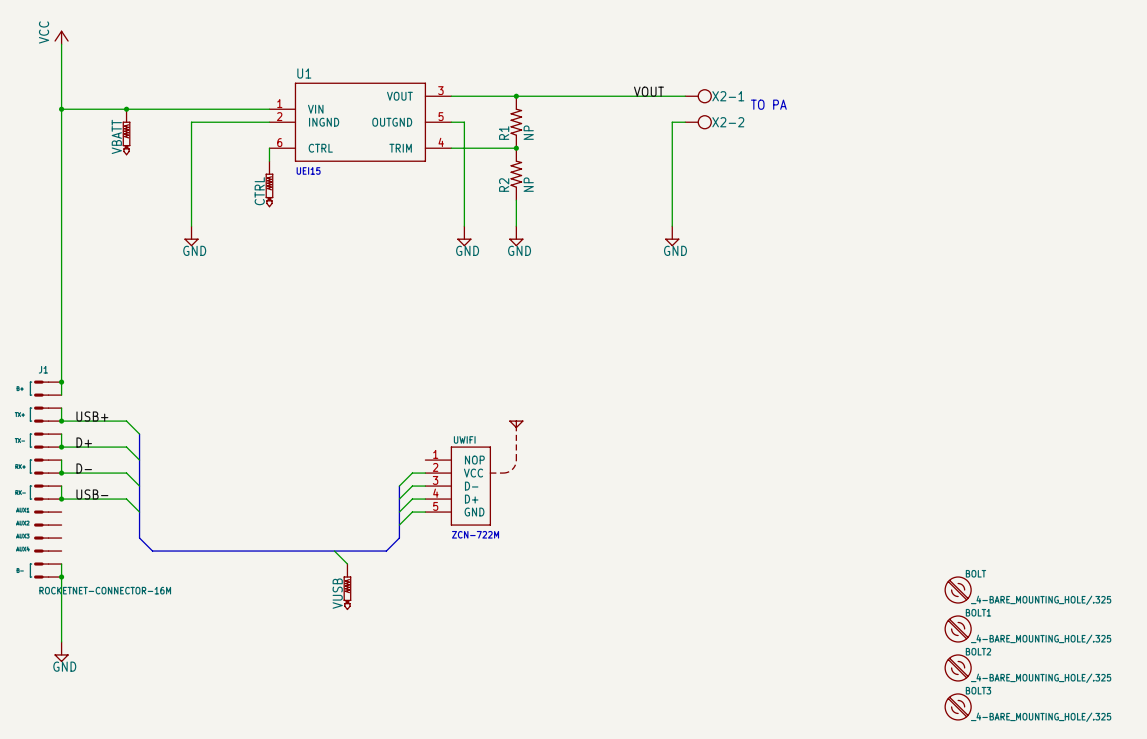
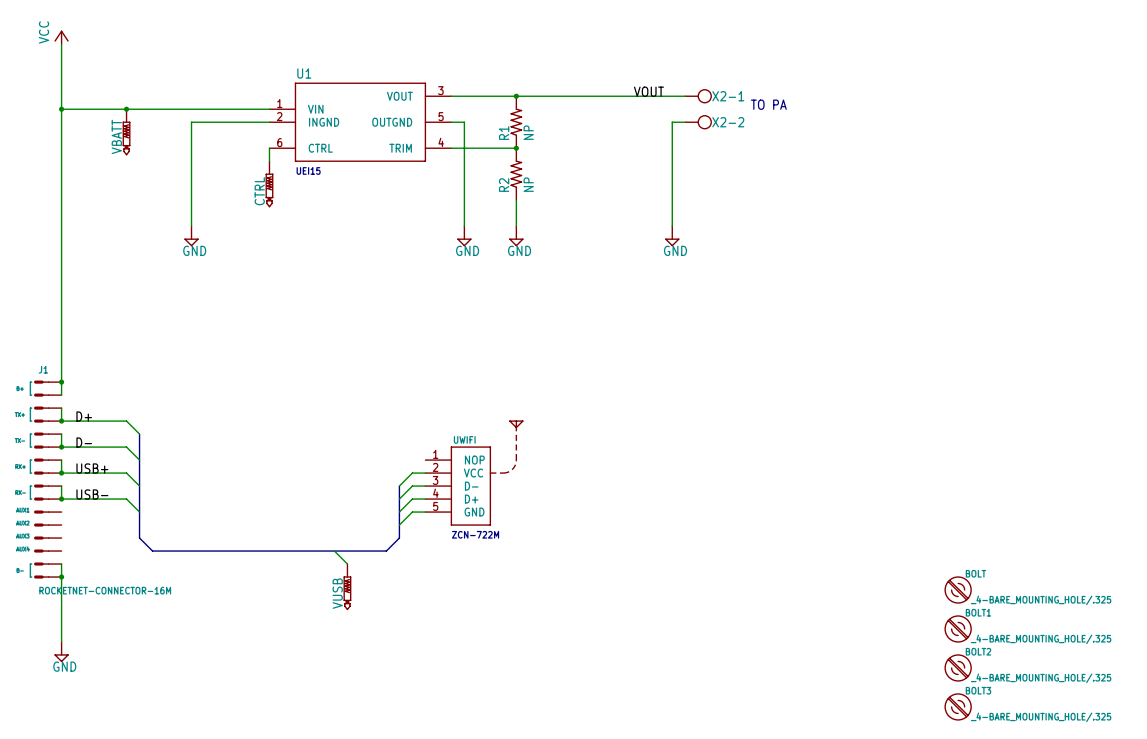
label: USB+ (92, 416) -> D+ (84, 416)
label: D+ (84, 442) -> D- (84, 442)
label: D- (84, 468) -> USB+ (92, 468)

